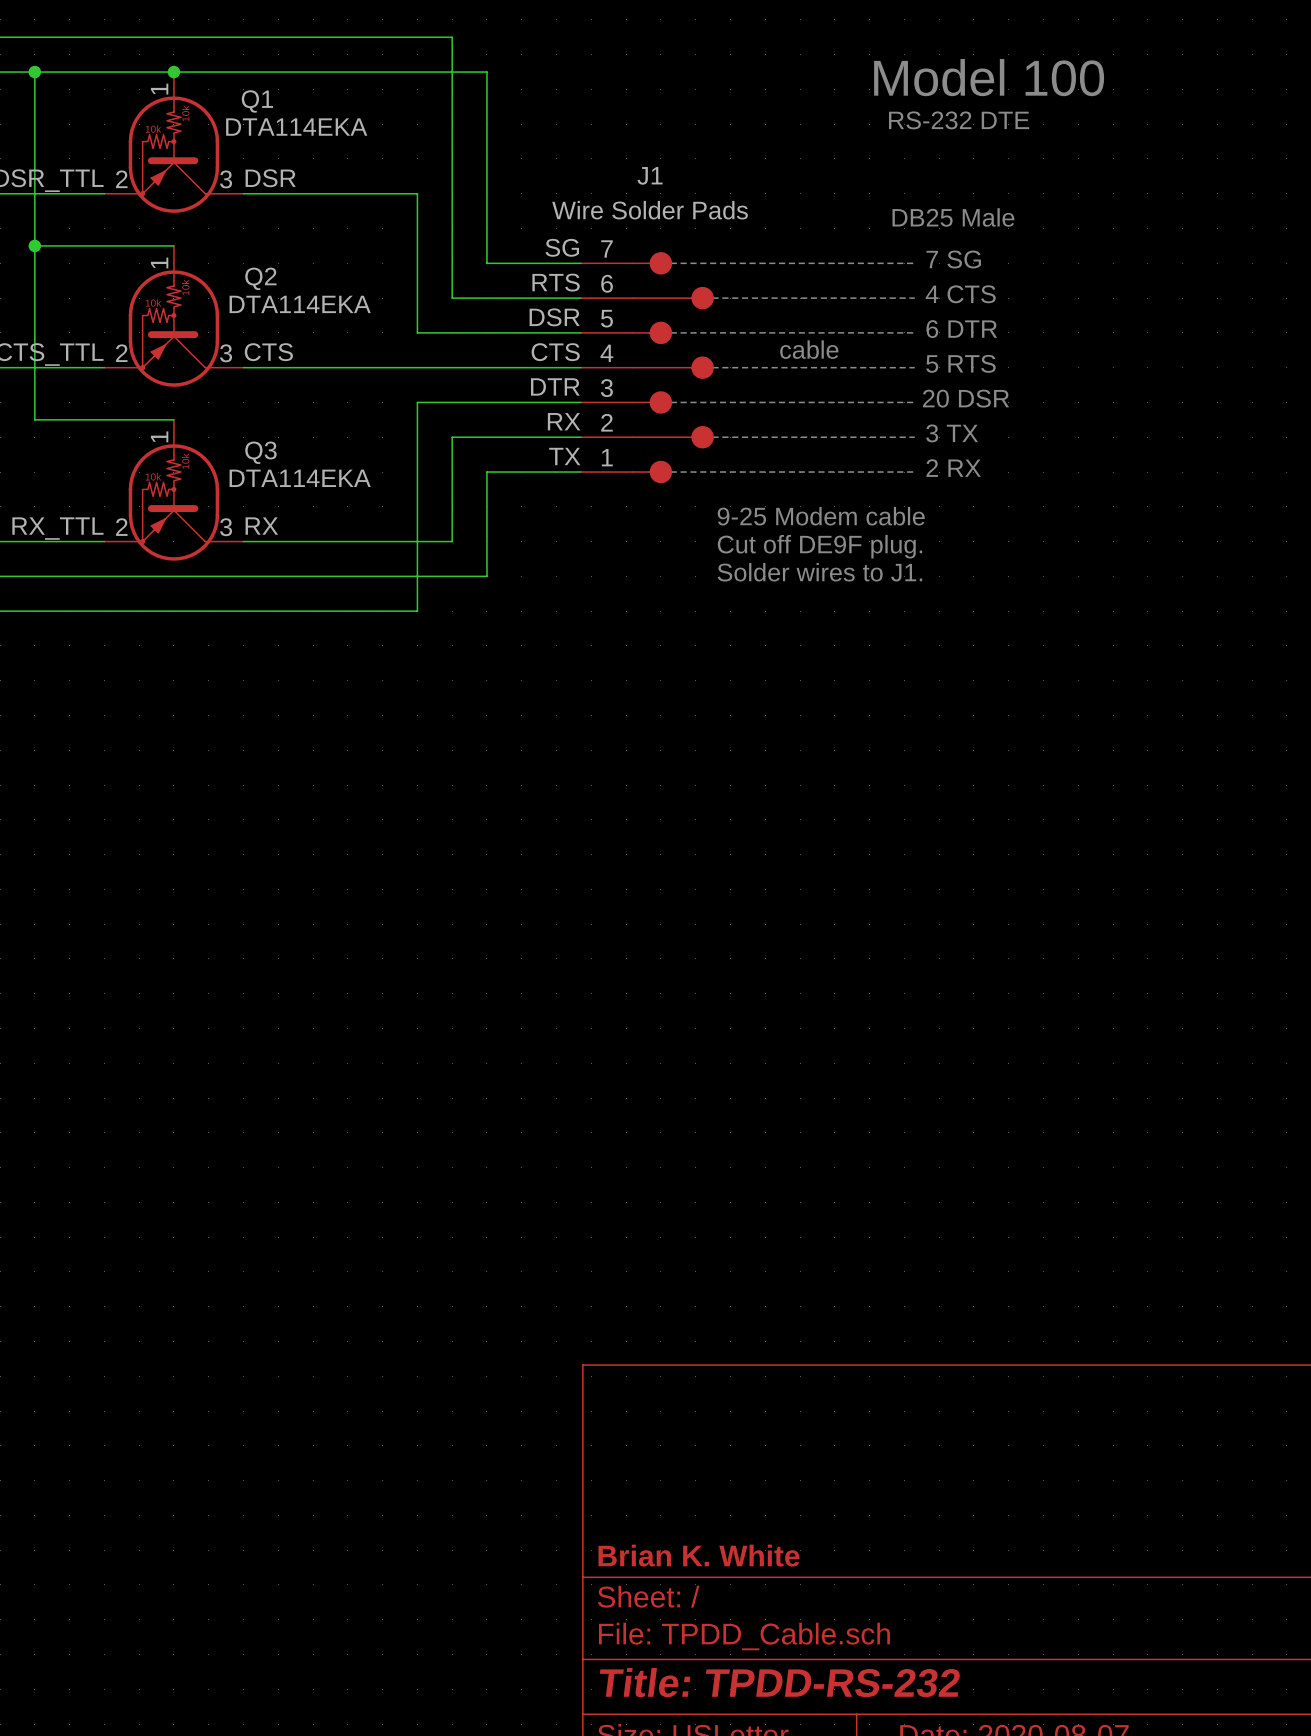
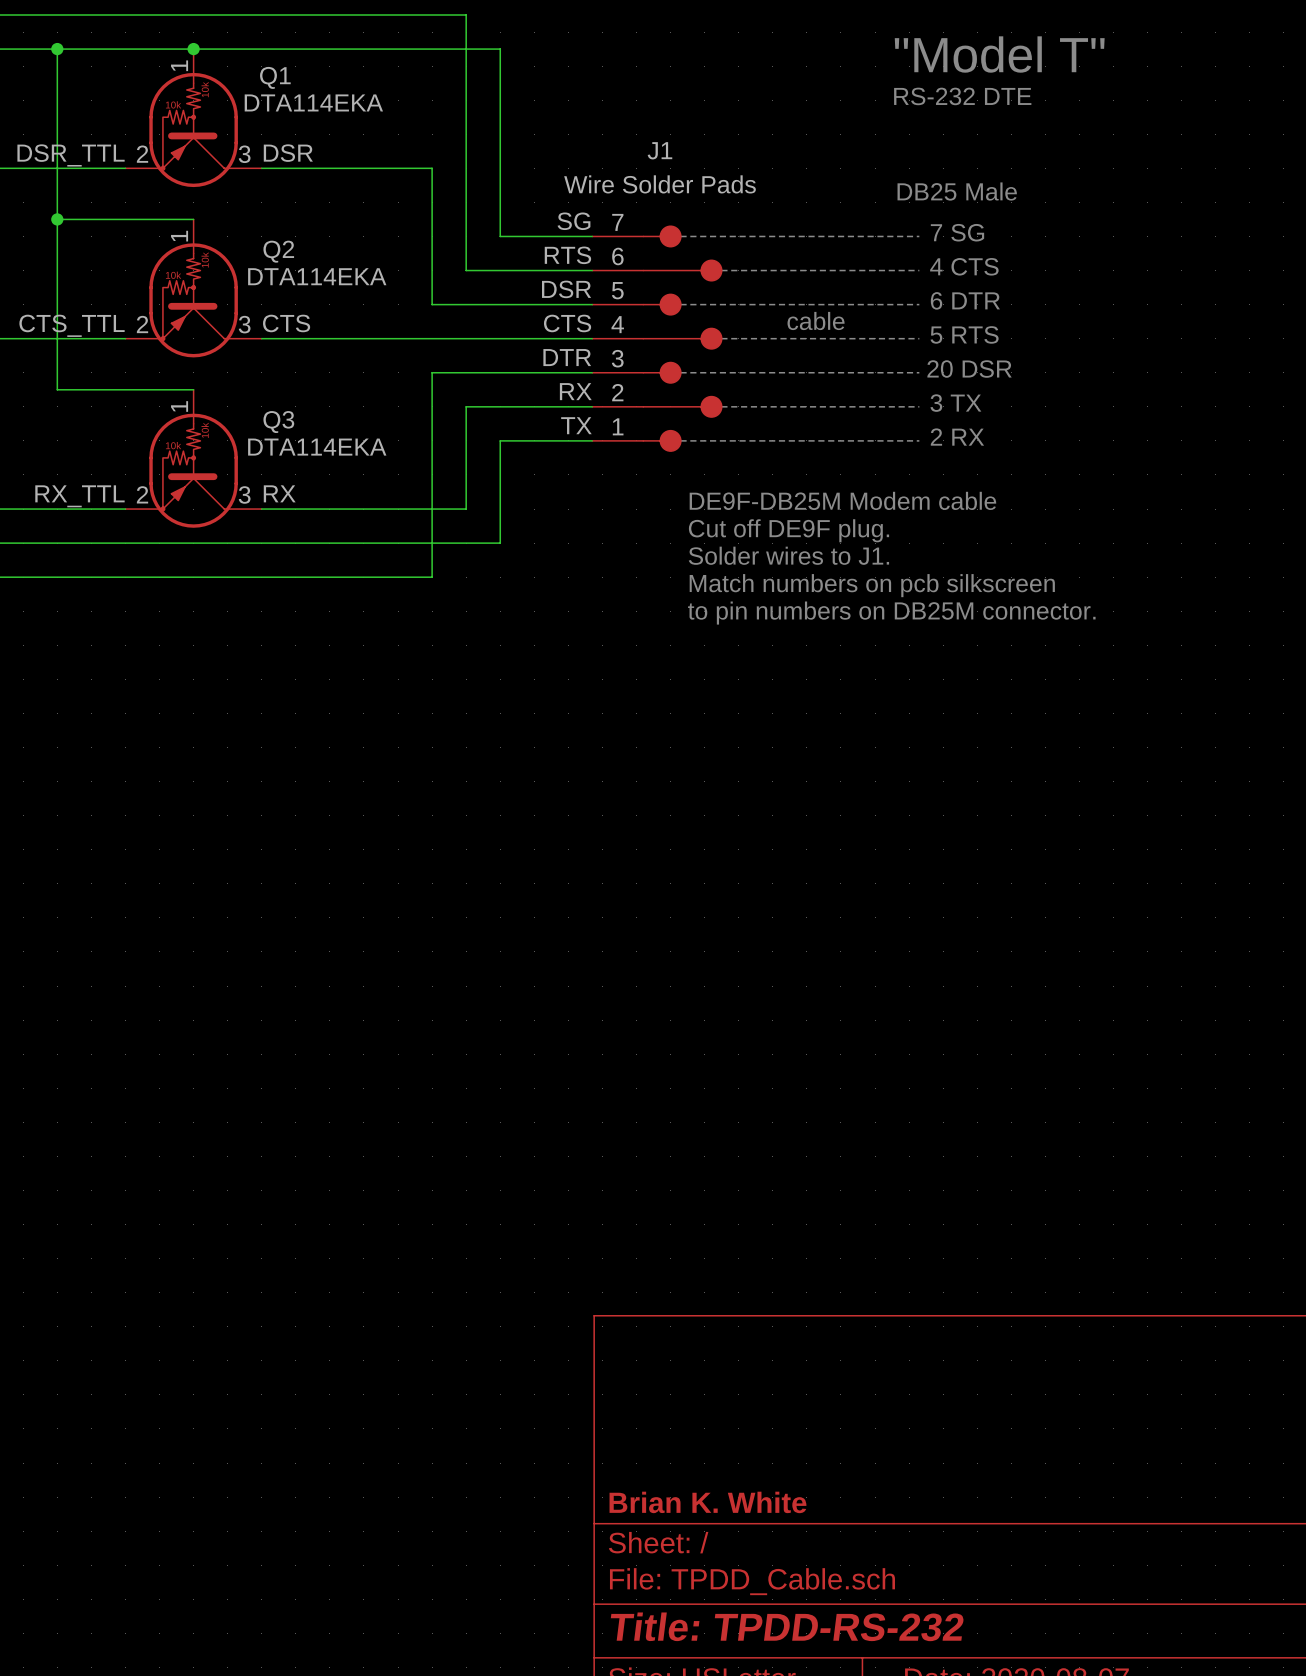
text: Model 100 (989, 77) -> "Model T" (999, 54)
text: 9-25 Modem cable (821, 516) -> DE9F-DB25M Modem cable (842, 500)
text position: Cut off DE9F plug. (819, 546) -> Cut off DE9F plug. (789, 530)
text position: Solder wires to J1. (819, 572) -> Solder wires to J1. (788, 555)
text: none -> Match numbers on pcb silkscreen (872, 585)
text: none -> to pin numbers on DB25M connector. (891, 613)

